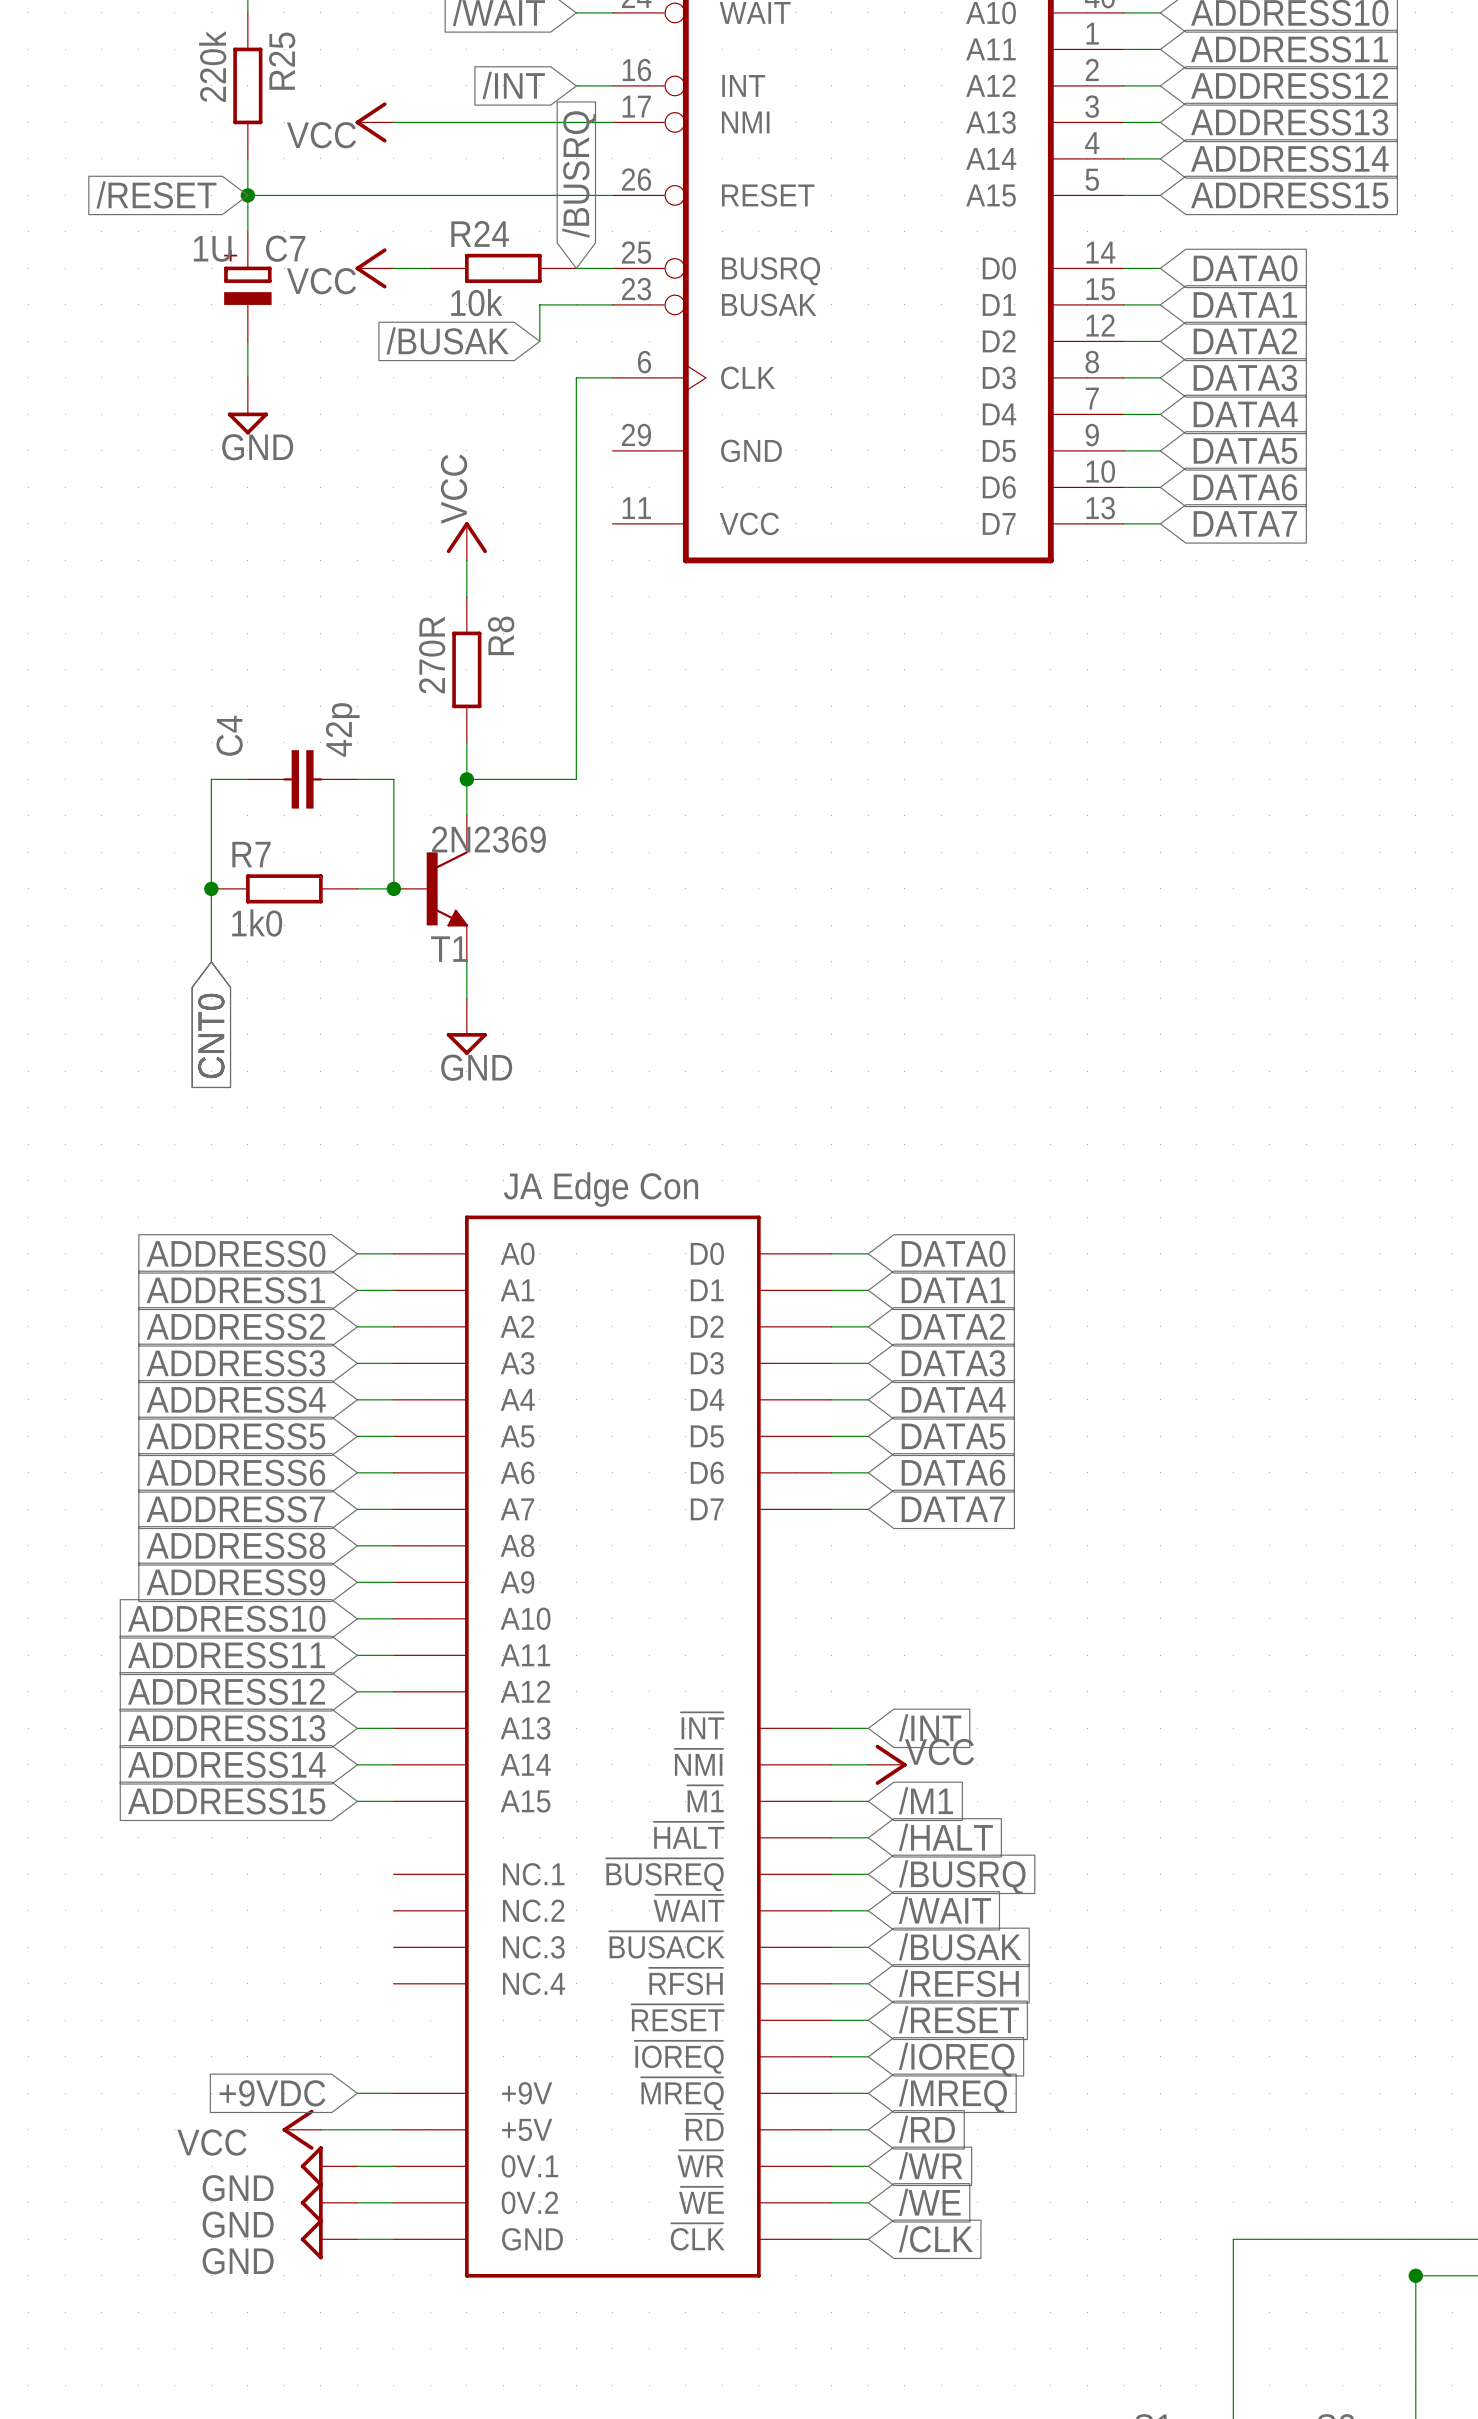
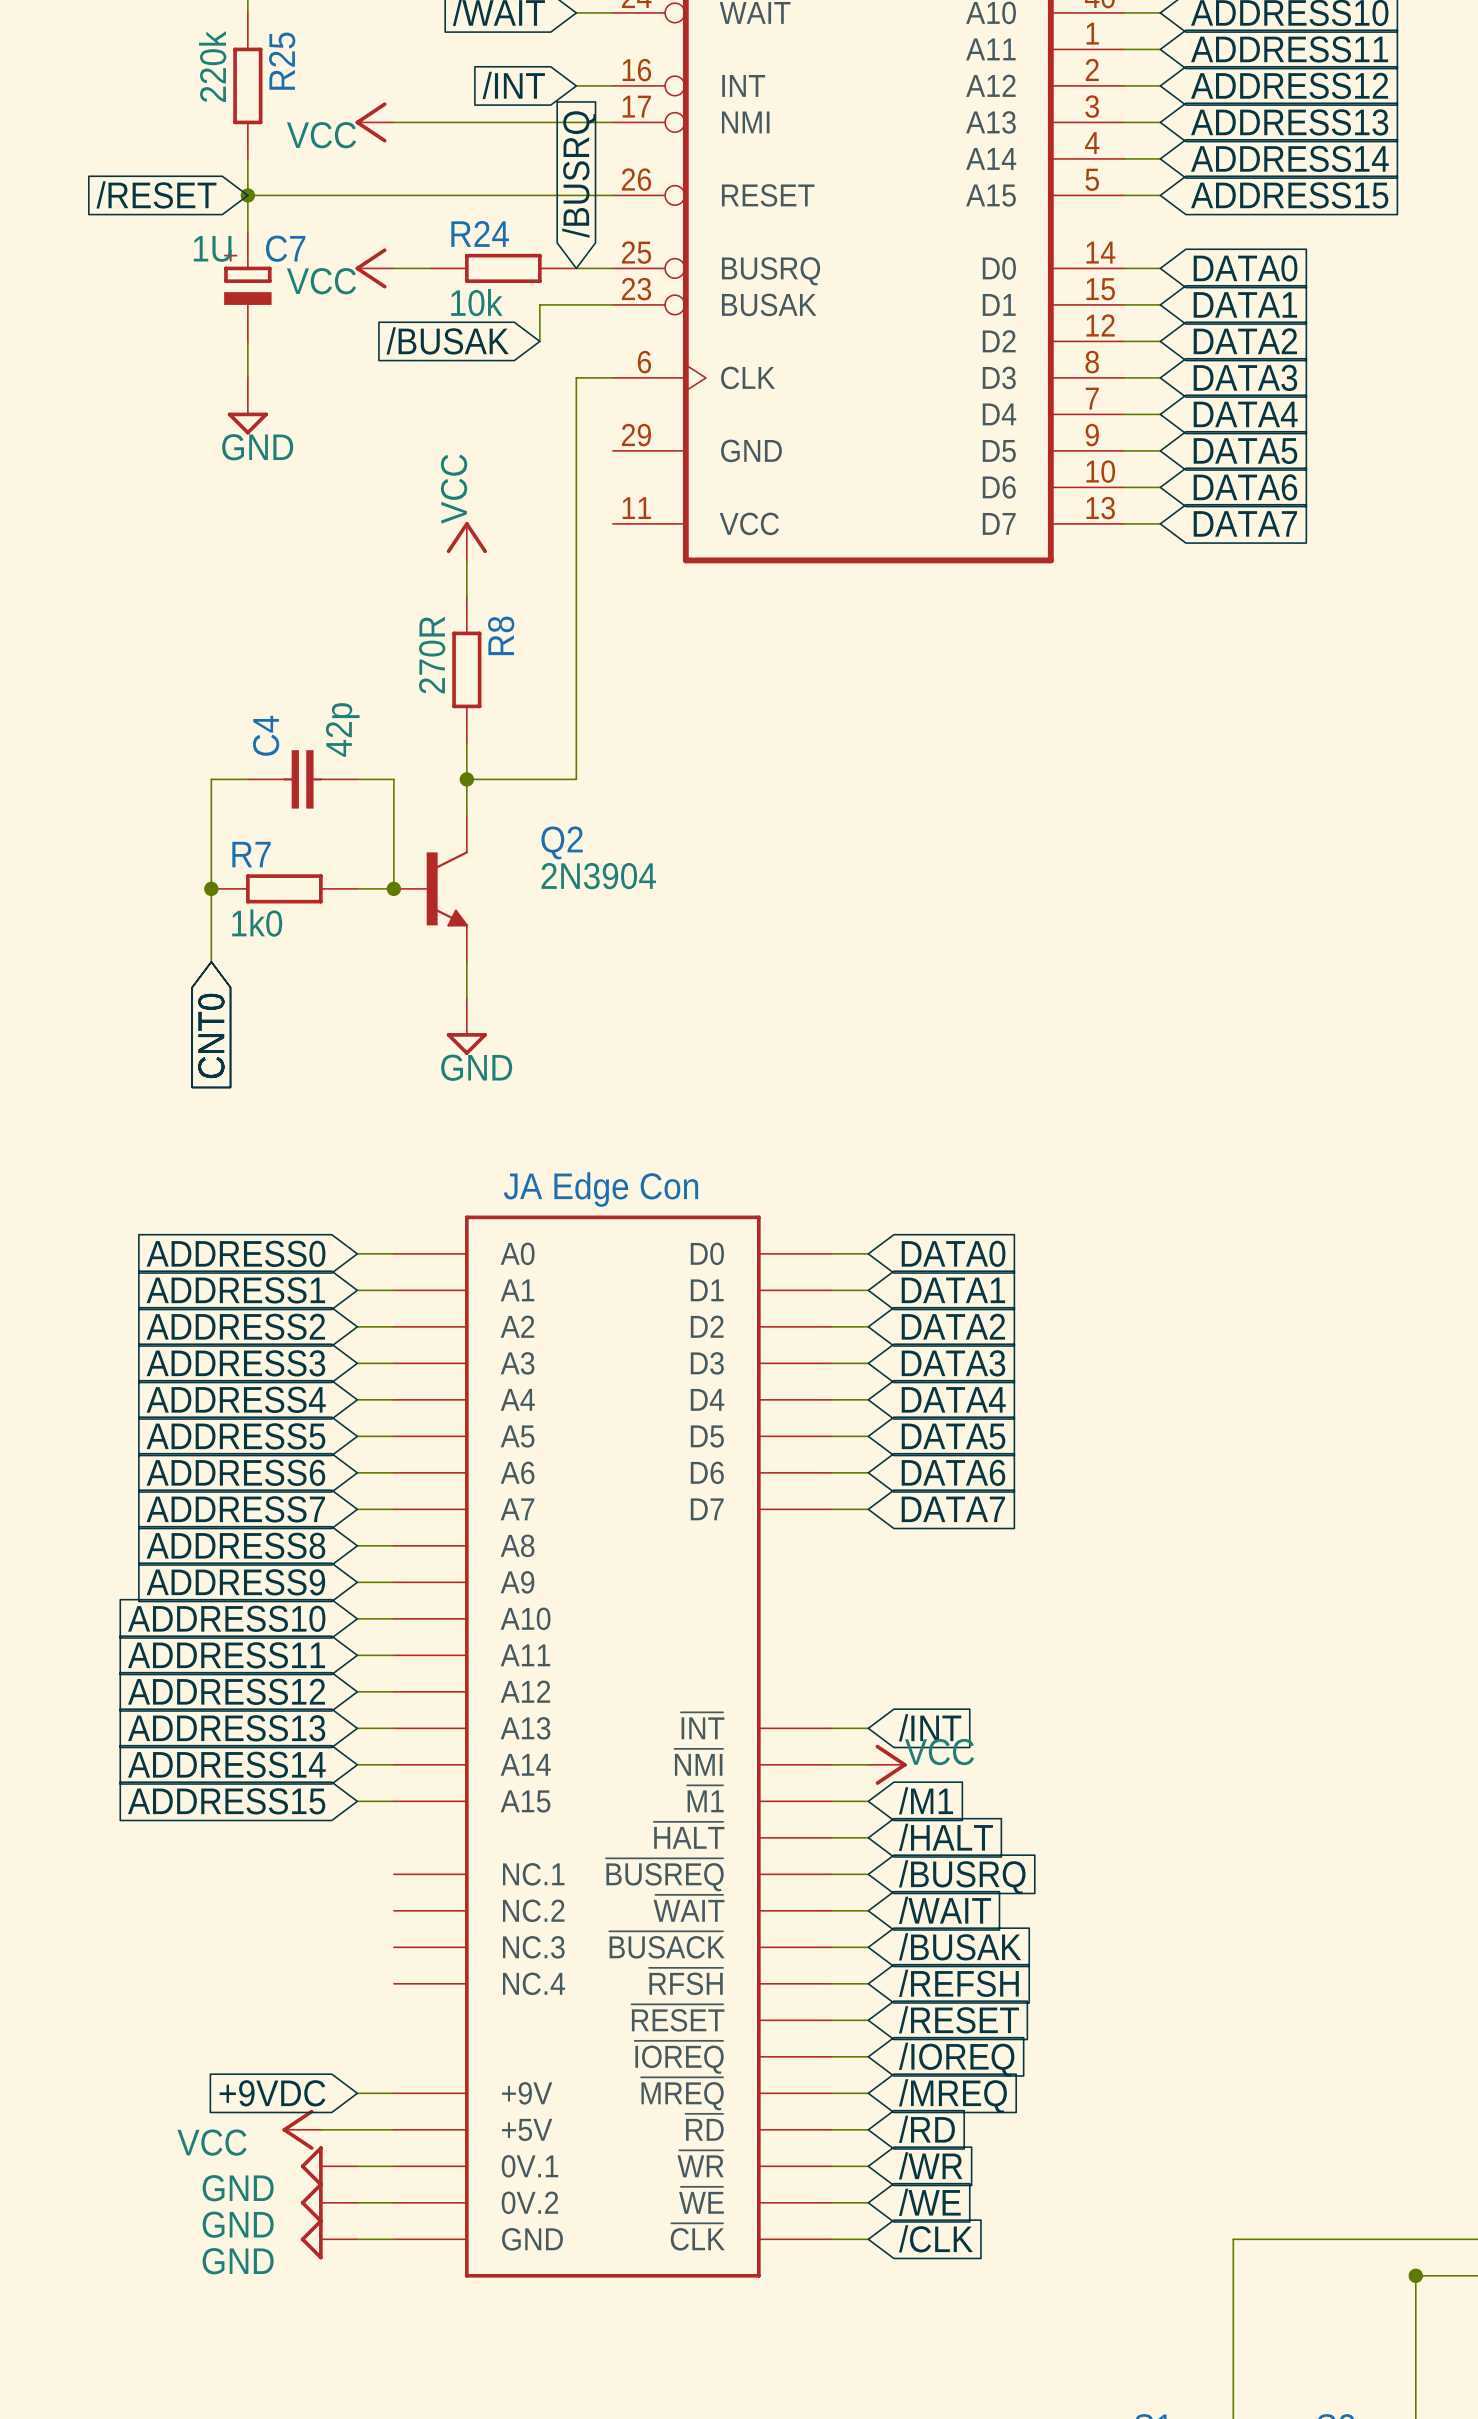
C4 name position: C4 (229, 735) -> C4 (266, 735)
T1 value: 2N2369 (488, 839) -> 2N3904 (598, 876)
T1 name: T1 (449, 949) -> Q2 (562, 842)

